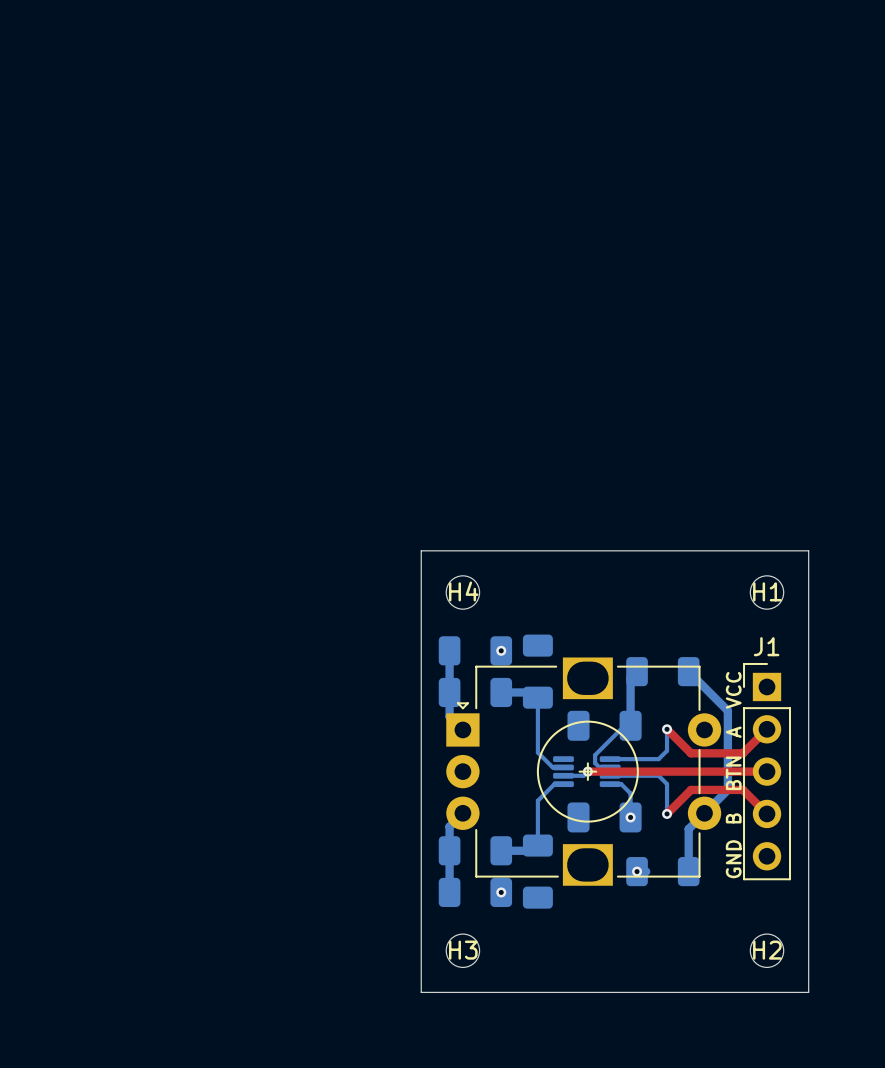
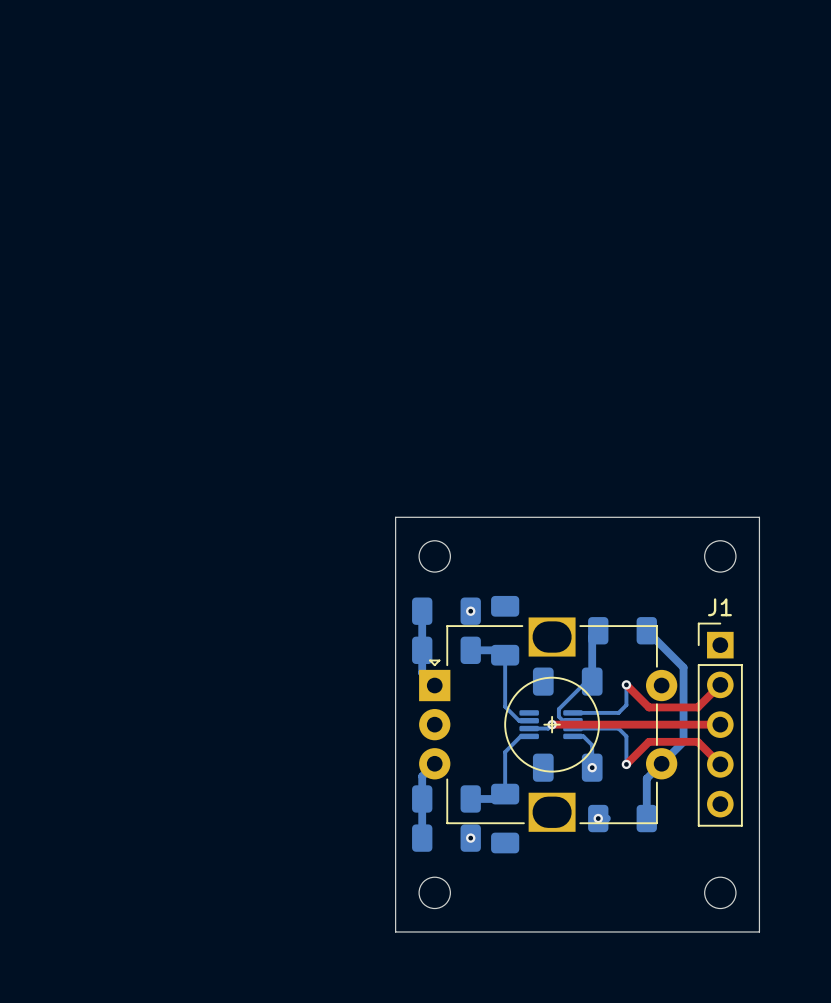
H4 name: H4 (463, 591) -> none
H1 name: H1 (767, 591) -> none
text: VCC (733, 690) -> none
text: A (733, 732) -> none
text: BTN (733, 773) -> none
text: B (733, 818) -> none
text: GND (733, 859) -> none
H3 name: H3 (463, 950) -> none
H2 name: H2 (767, 950) -> none

